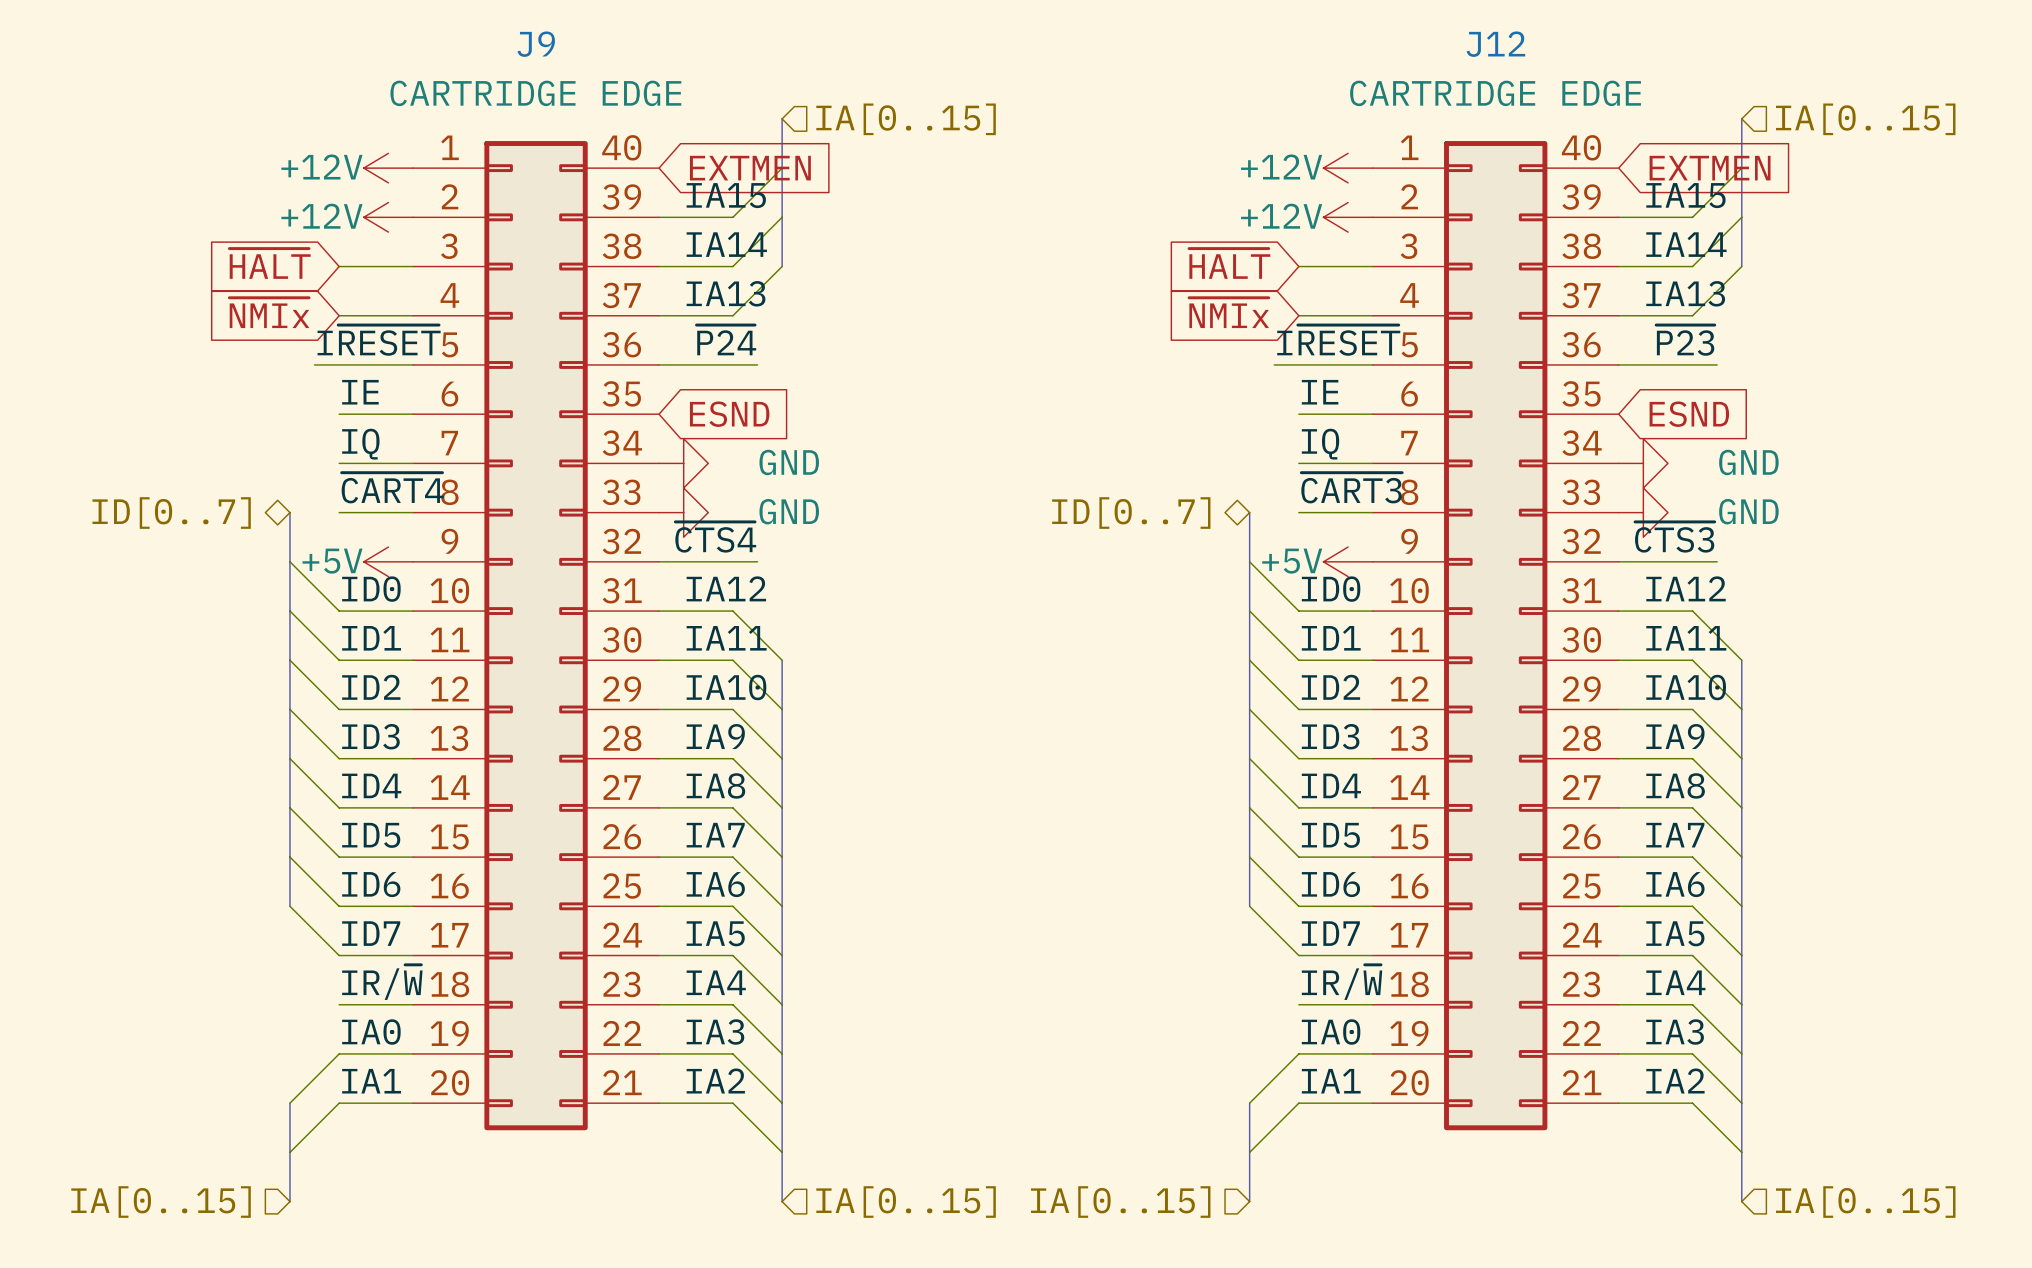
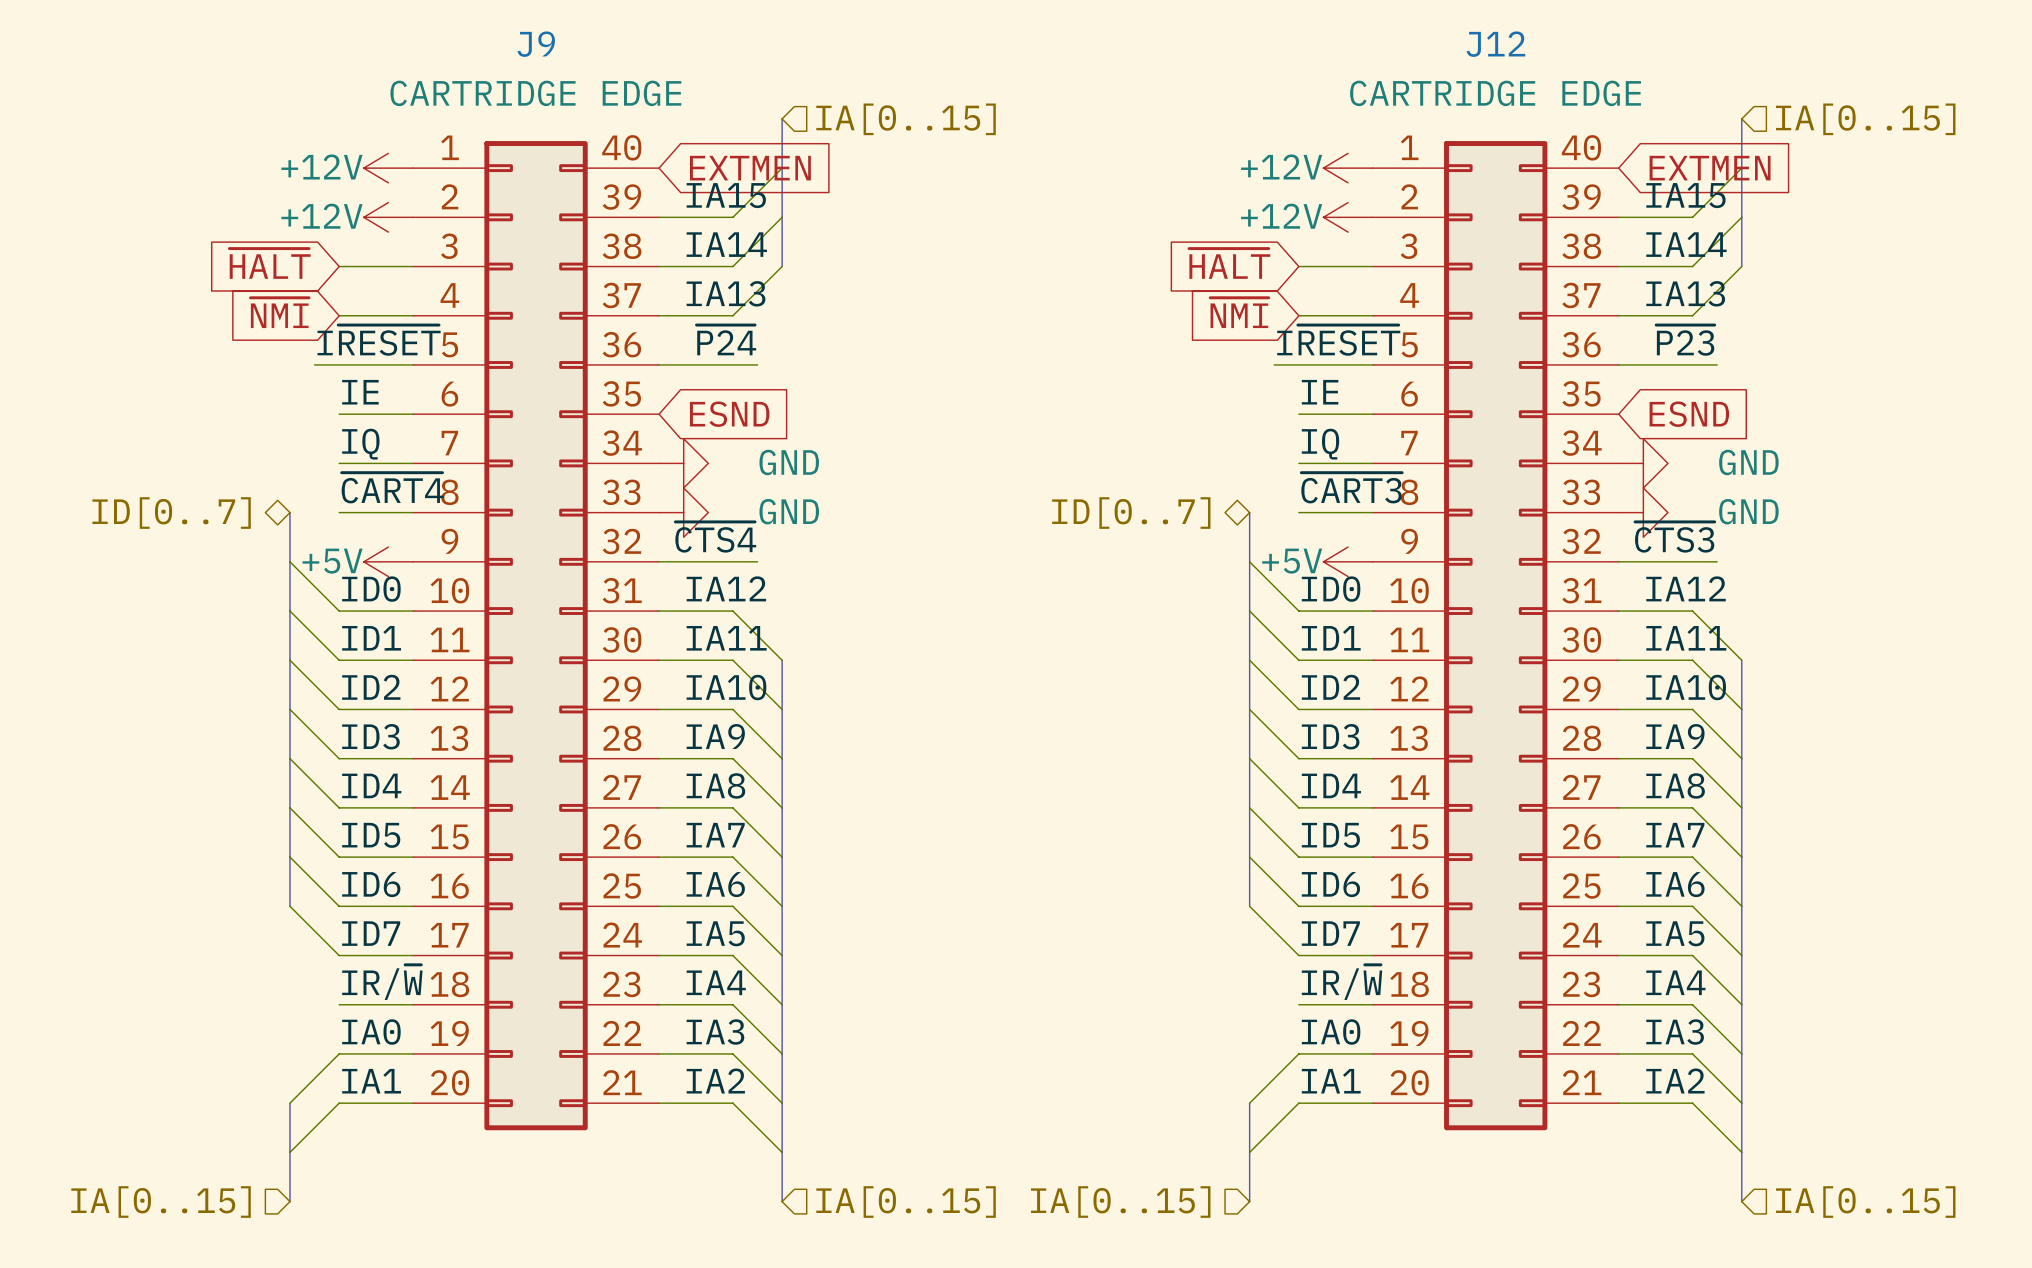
global label: ~{NMIx} (269, 312) -> ~{NMI} (279, 312)
global label: ~{NMIx} (1229, 312) -> ~{NMI} (1239, 312)

